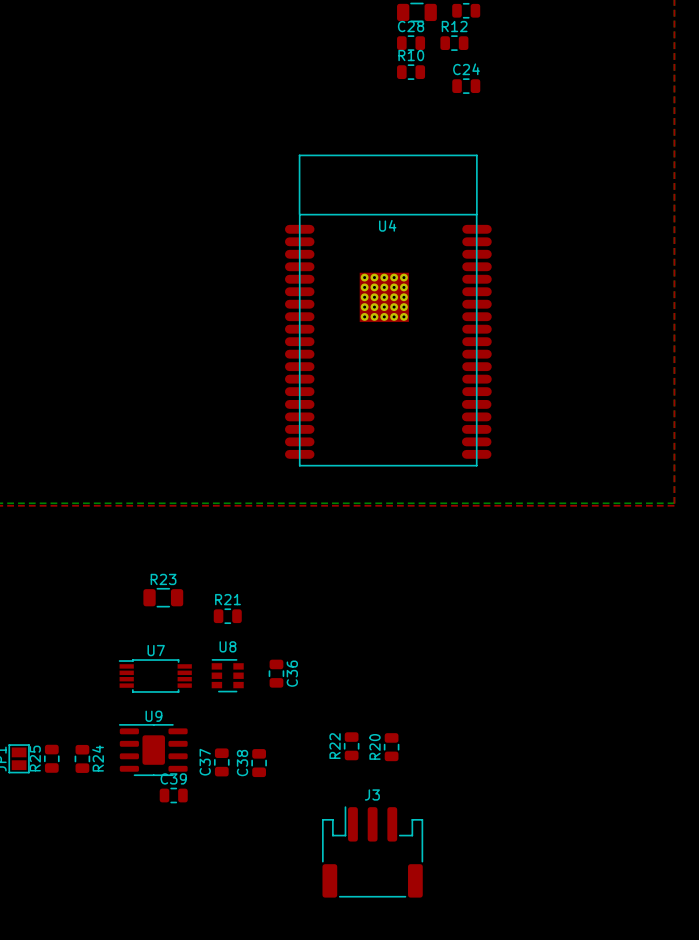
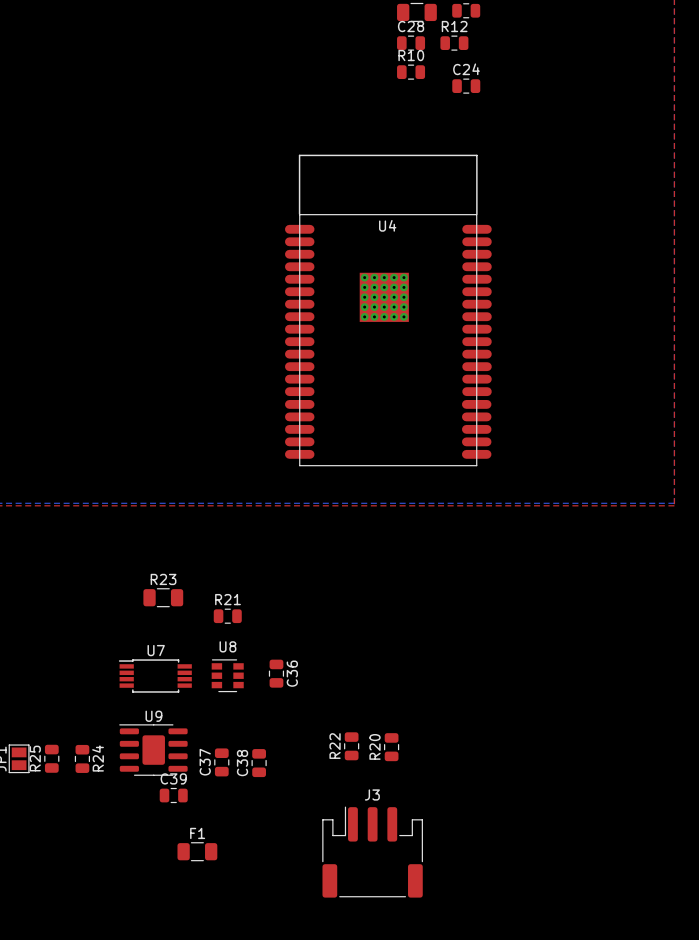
F1: none -> (197, 851)

